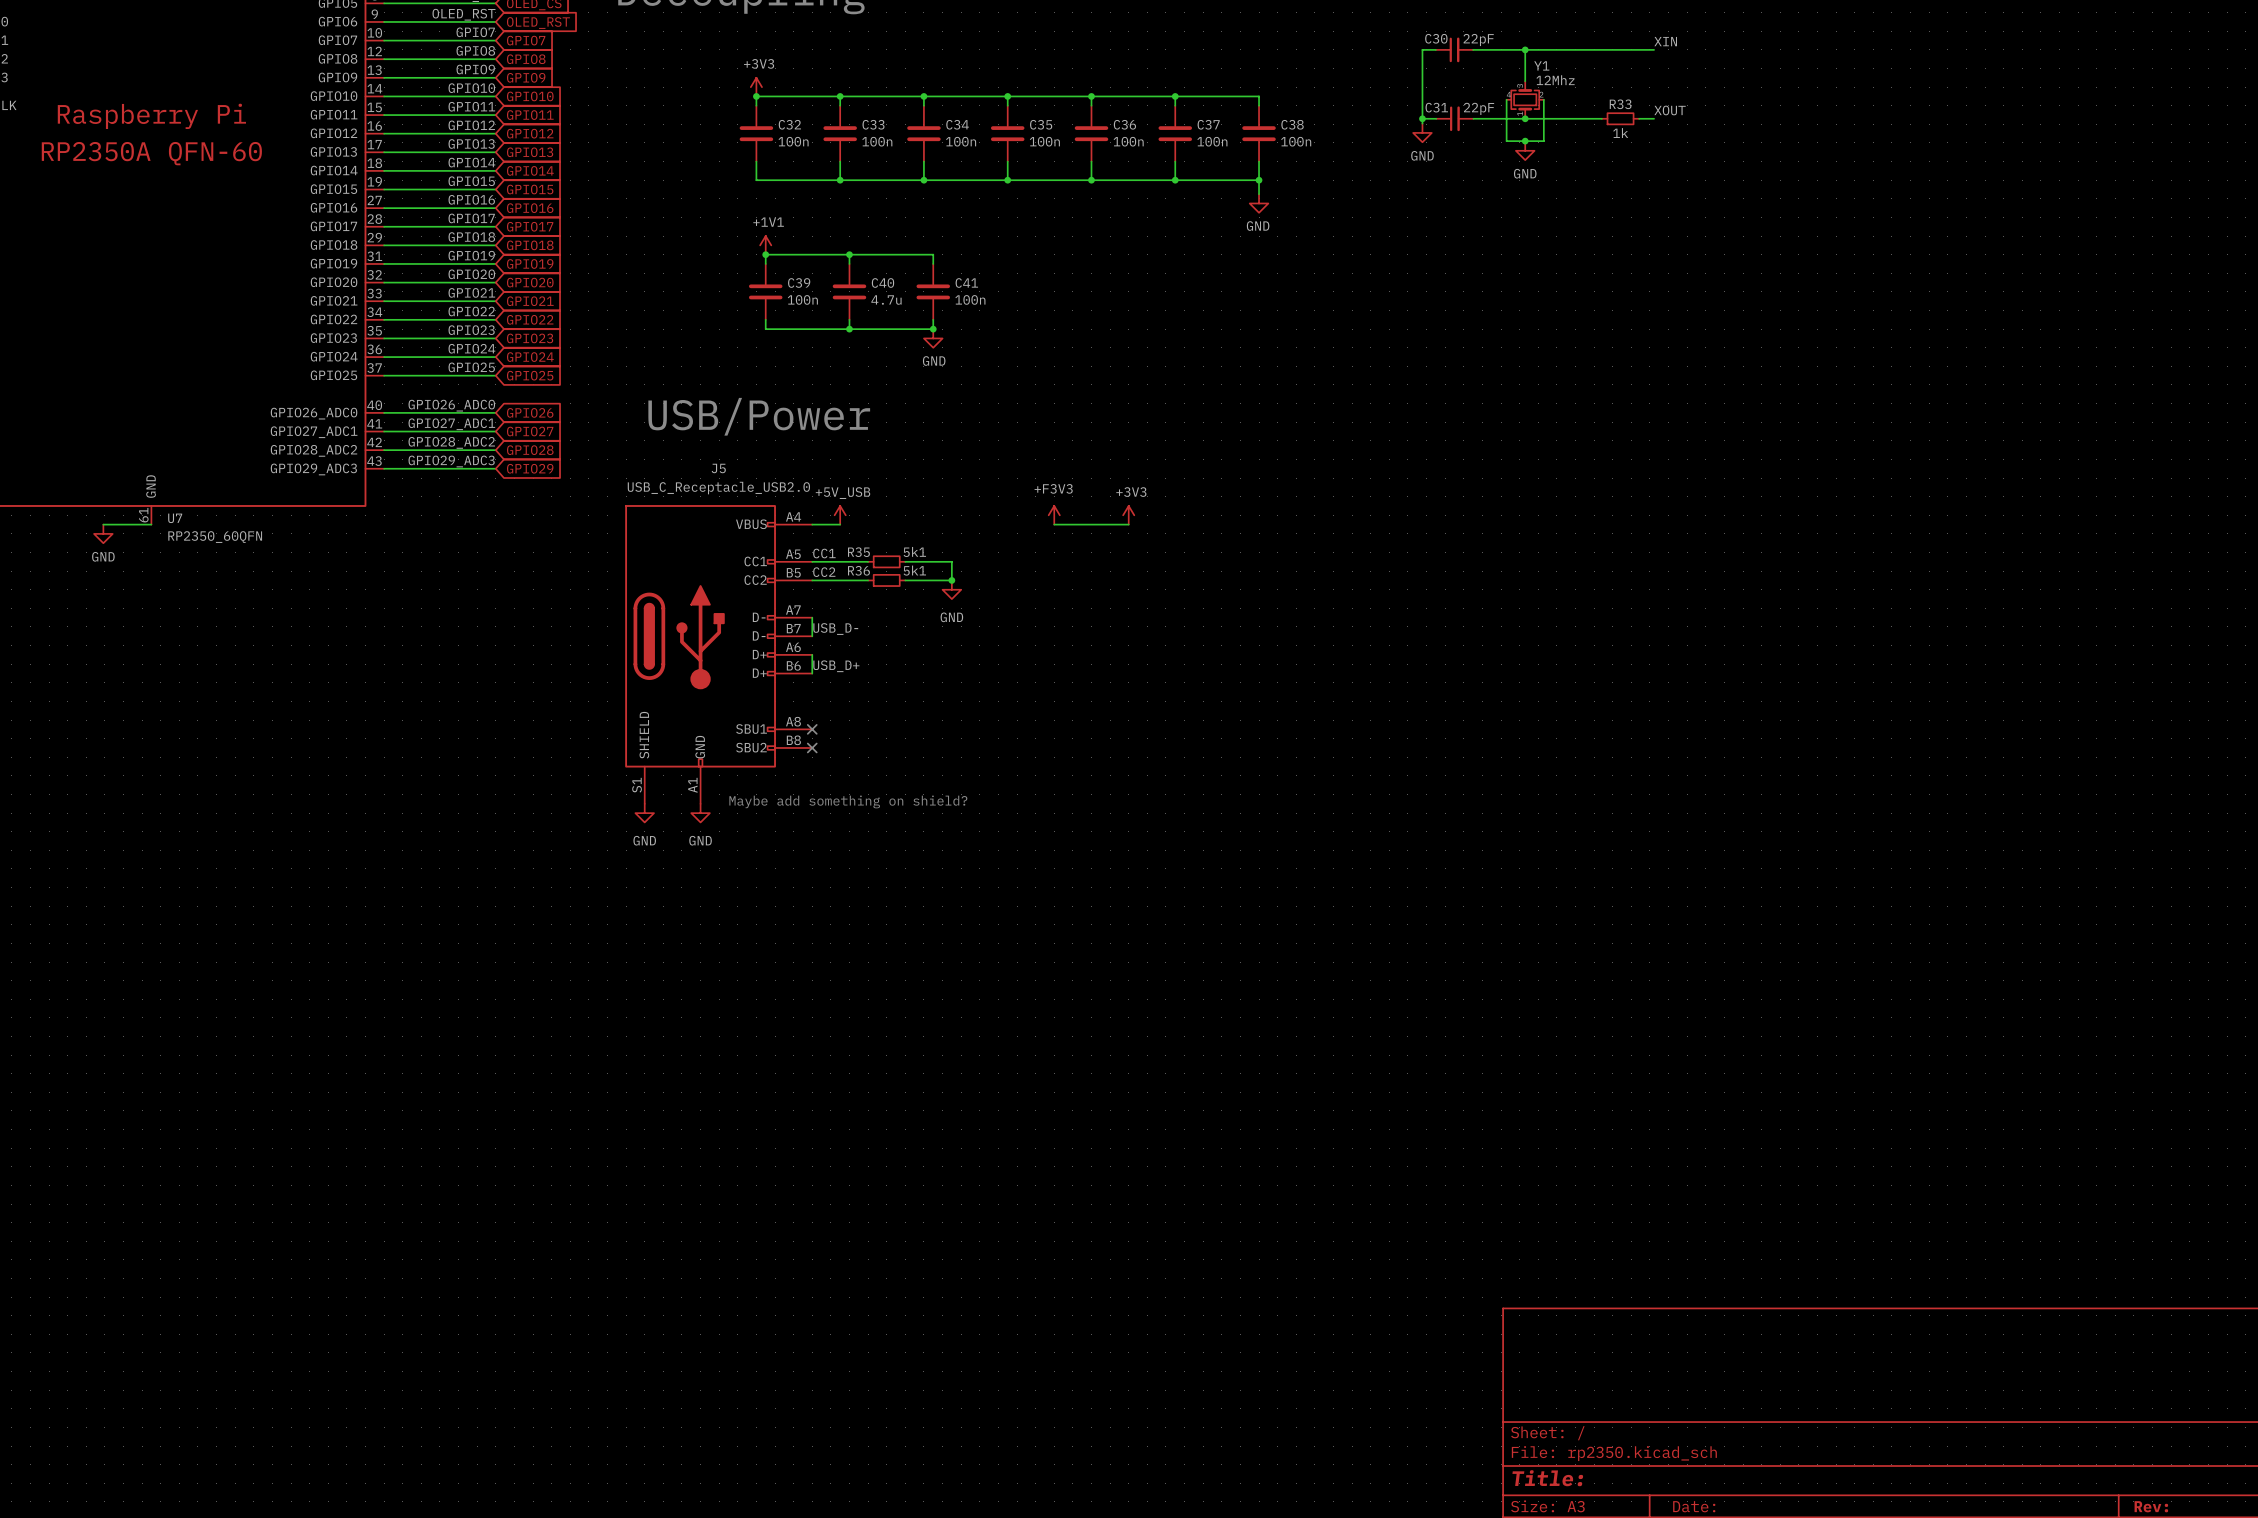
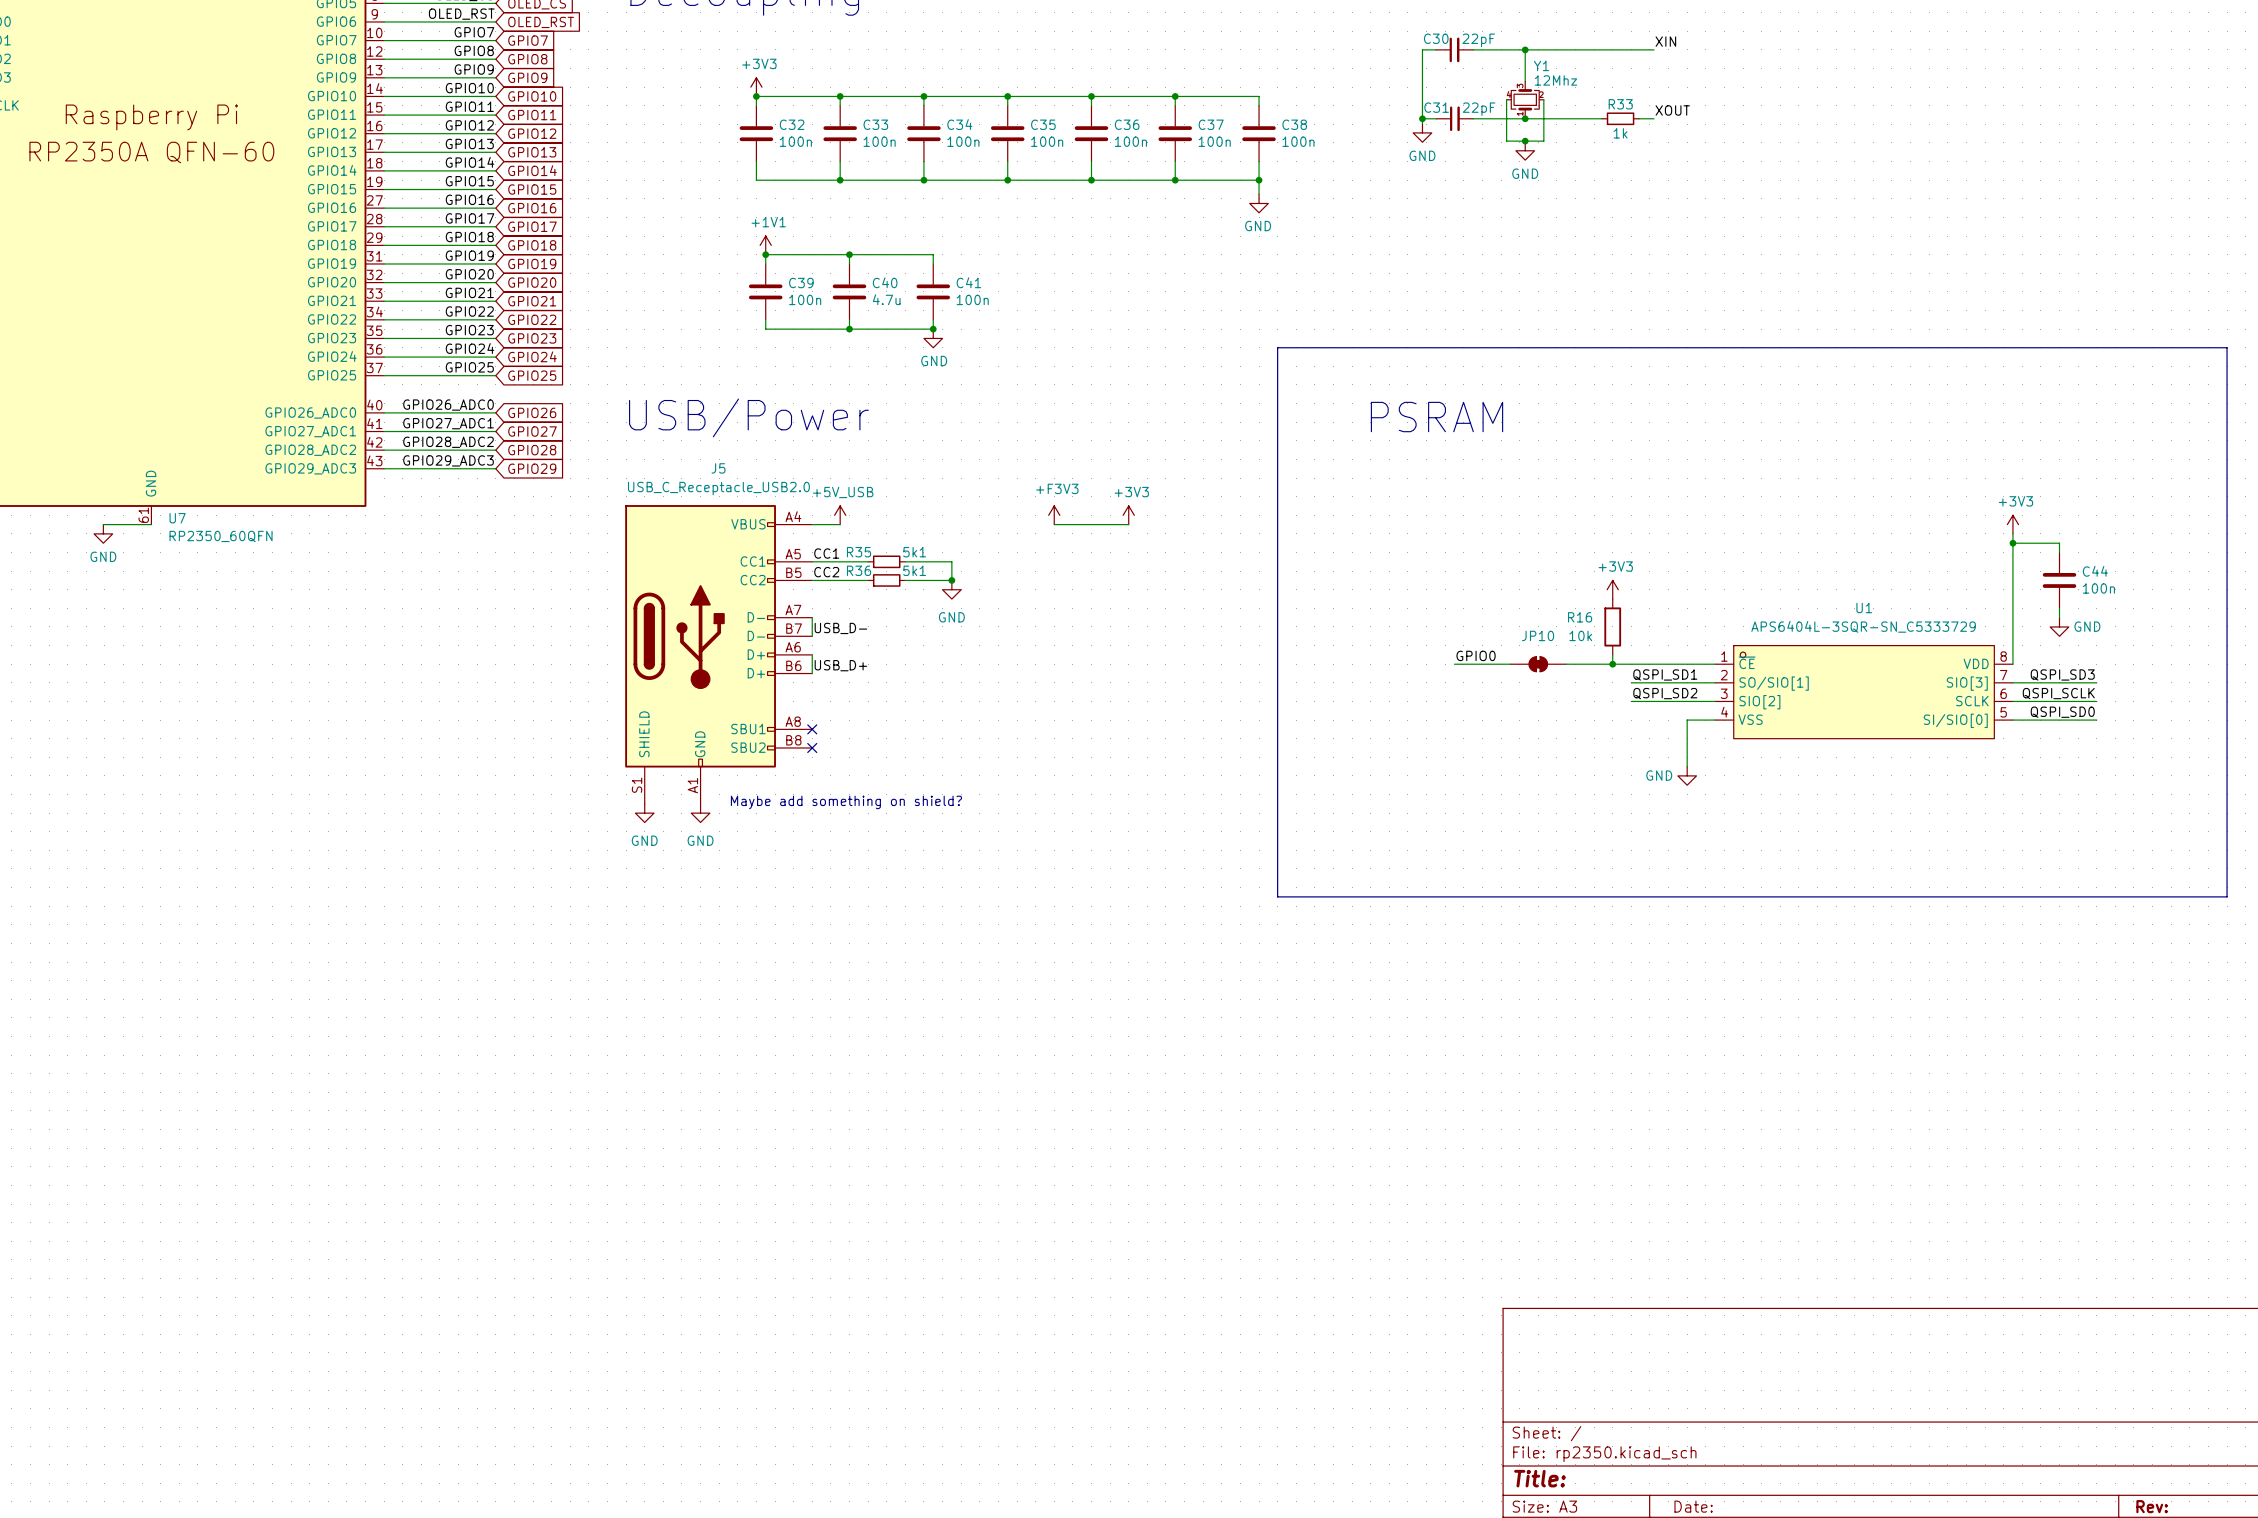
line: none -> (1277, 347) (2227, 347) (2227, 896) (1277, 896) (1277, 347)
text: none -> PSRAM (1437, 417)
power symbol: none -> +3V3 (2012, 524)
wire: none -> (2012, 533) (2012, 664)
wire: none -> (2012, 543) (2059, 543) (2059, 552)
junction: none -> (2012, 543)
C44: none -> 100n (2059, 580)
power symbol: none -> +3V3 (1612, 589)
wire: none -> (2059, 608) (2059, 617)
R16: none -> 10k (1612, 626)
power symbol: none -> GND (2059, 626)
wire: none -> (1612, 654) (1612, 664)
label: none -> GPIO0 (1476, 655)
wire: none -> (1454, 664) (1510, 664)
JP10: none -> (1538, 664)
wire: none -> (1566, 664) (1715, 664)
junction: none -> (1612, 664)
label: none -> QSPI_SD1 (1665, 674)
label: none -> QSPI_SD3 (2062, 674)
wire: none -> (1631, 682) (1715, 682)
wire: none -> (2012, 682) (2096, 682)
U1: none -> APS6404L-3SQR-SN_C5333729 (1864, 692)
label: none -> QSPI_SD2 (1665, 693)
label: none -> QSPI_SCLK (2058, 693)
wire: none -> (1631, 701) (1715, 701)
wire: none -> (2012, 701) (2096, 701)
label: none -> QSPI_SD0 (2062, 712)
wire: none -> (1715, 720) (1687, 720) (1687, 766)
wire: none -> (2012, 720) (2096, 720)
power symbol: none -> GND (1687, 775)

